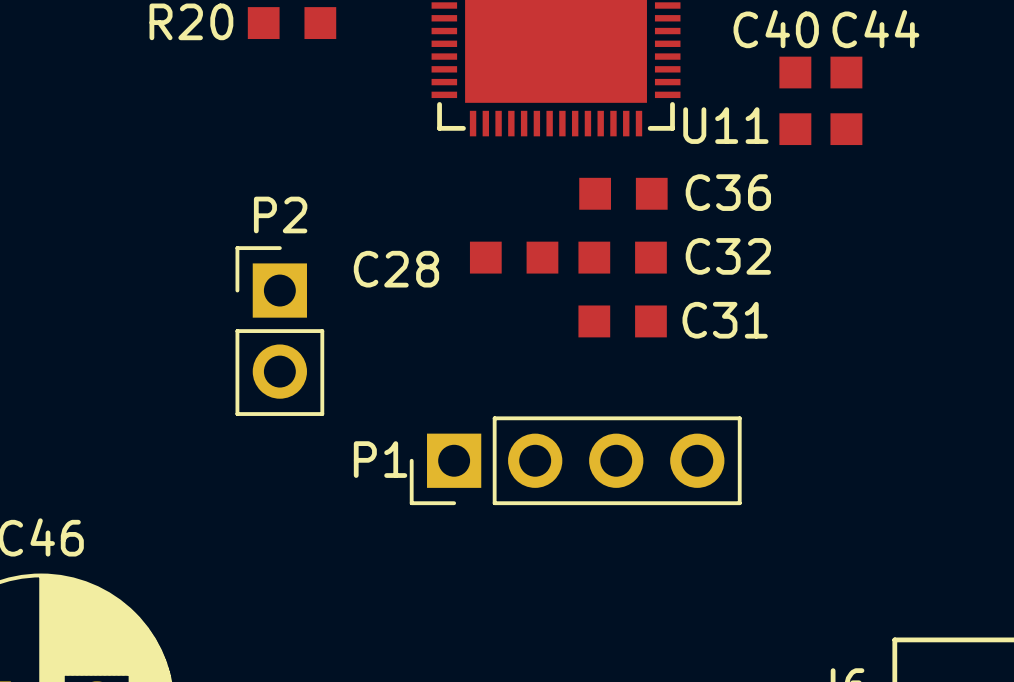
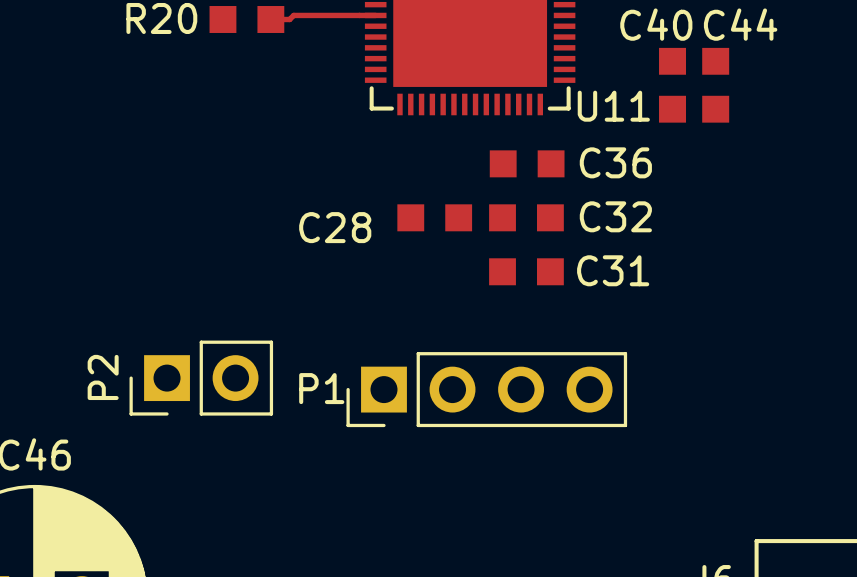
top track: none -> (375, 15) (293, 15) (289, 19) (270, 19)
P2 rotation: 0° (279, 331) -> 90° counterclockwise (201, 378)
P2 position: (279, 331) -> (201, 378)

